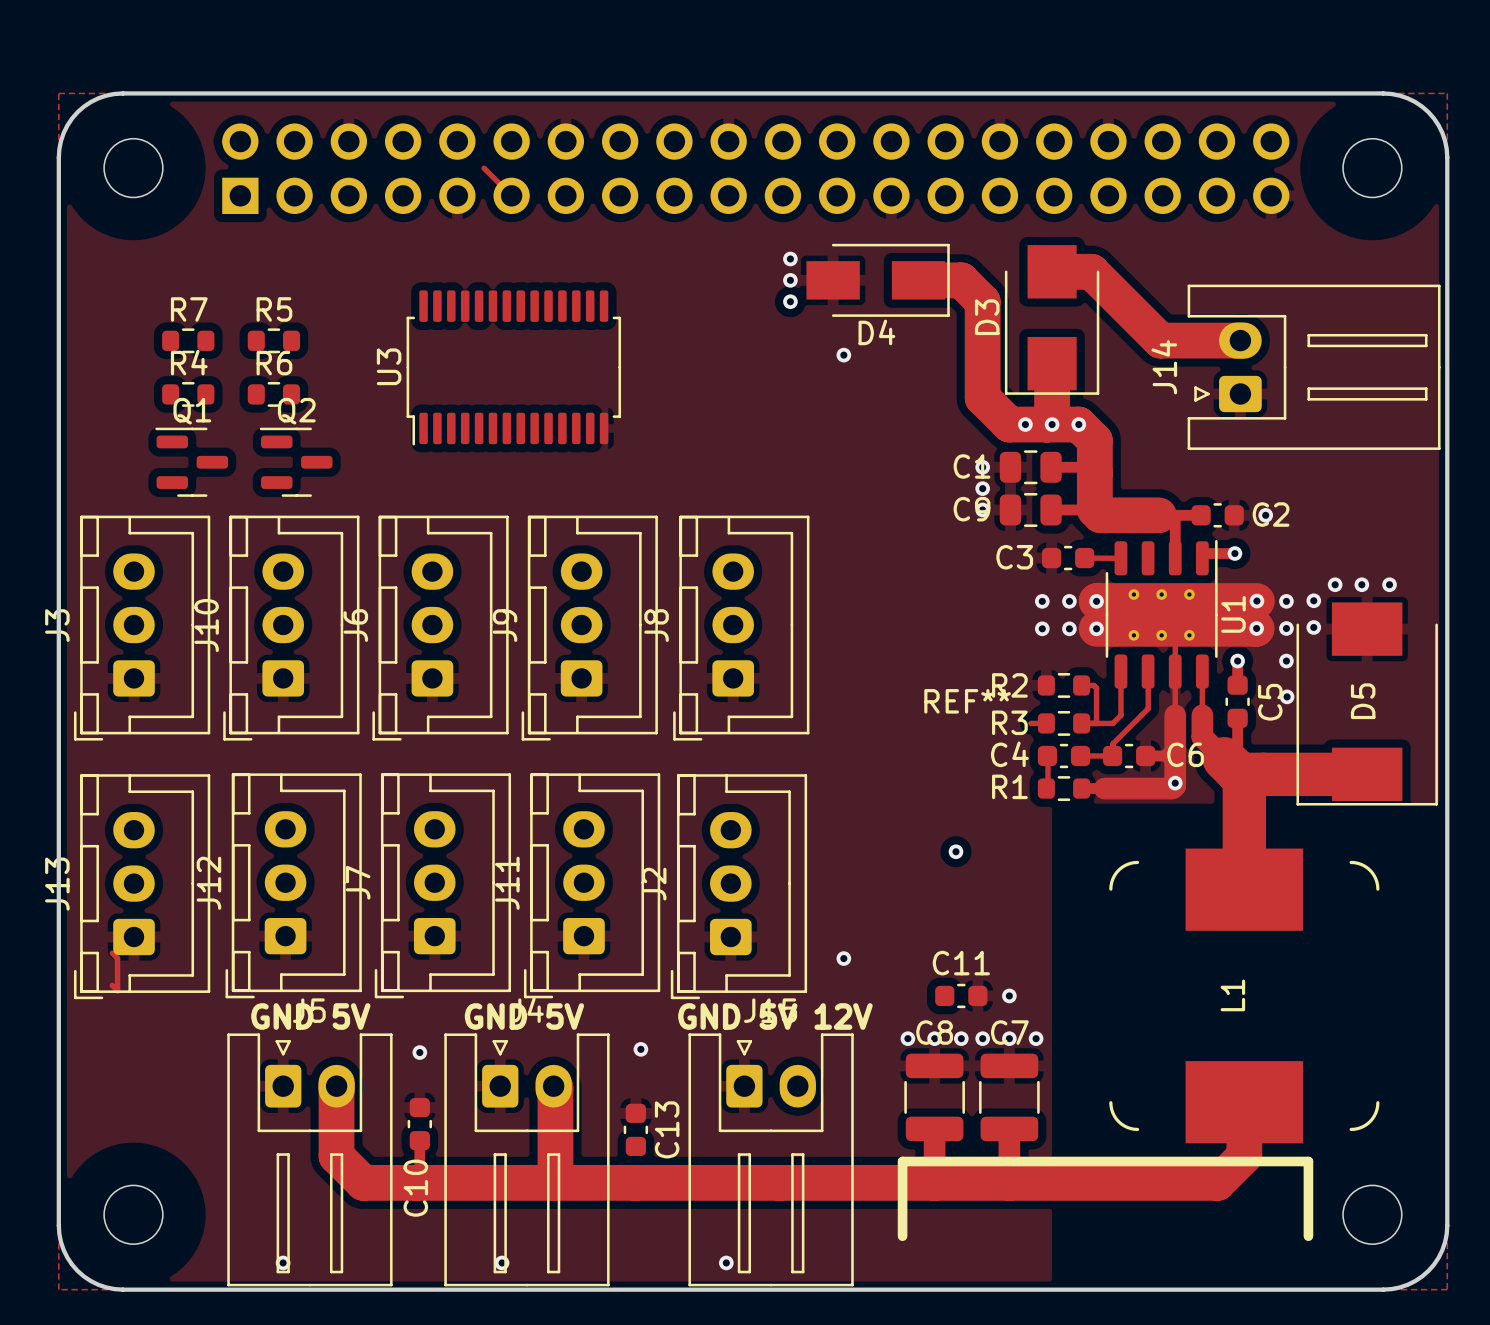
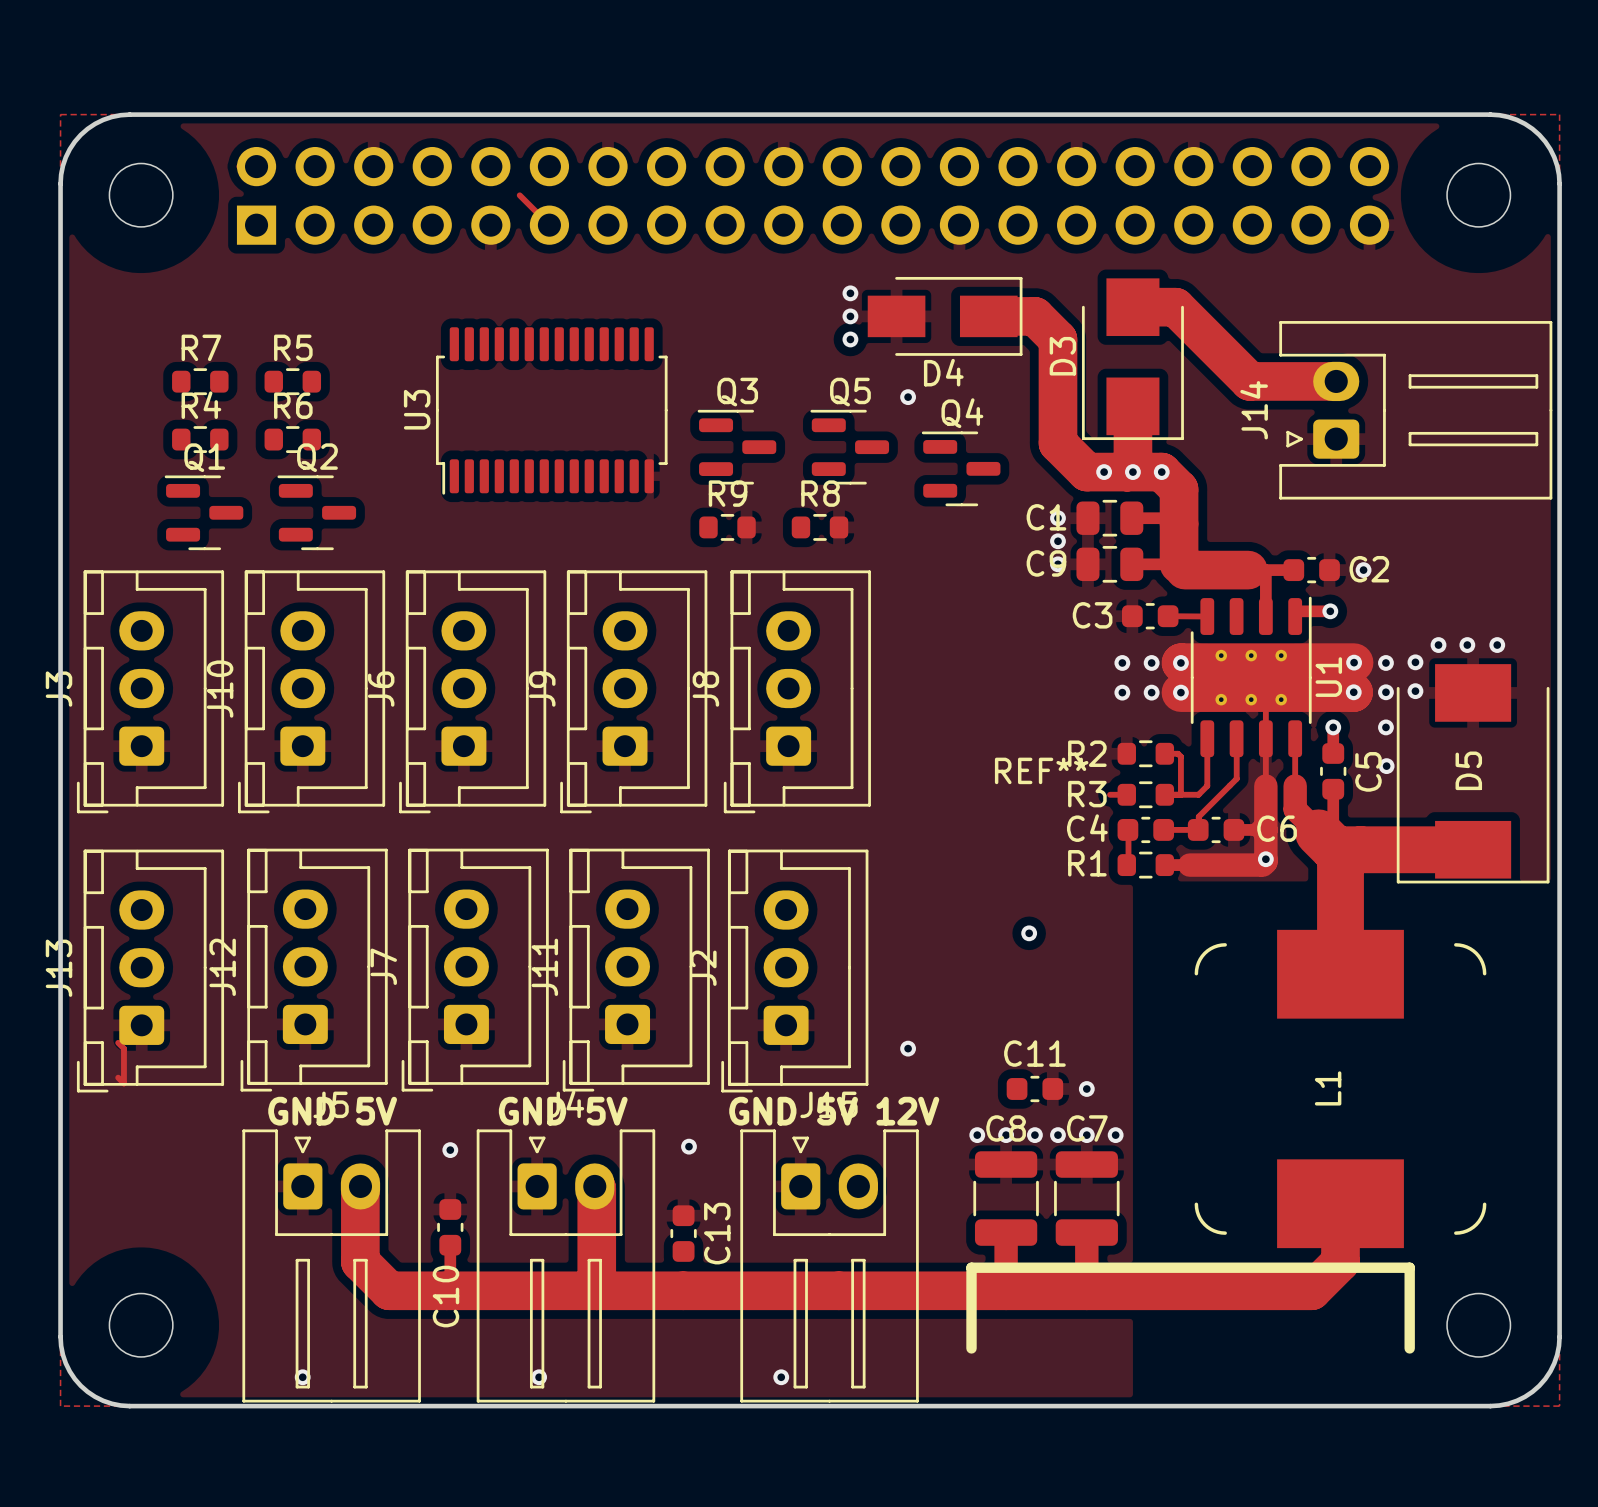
Q3: none -> (736, 447)
Q5: none -> (849, 447)
Q4: none -> (961, 468)
R9: none -> (727, 527)
R8: none -> (819, 527)

